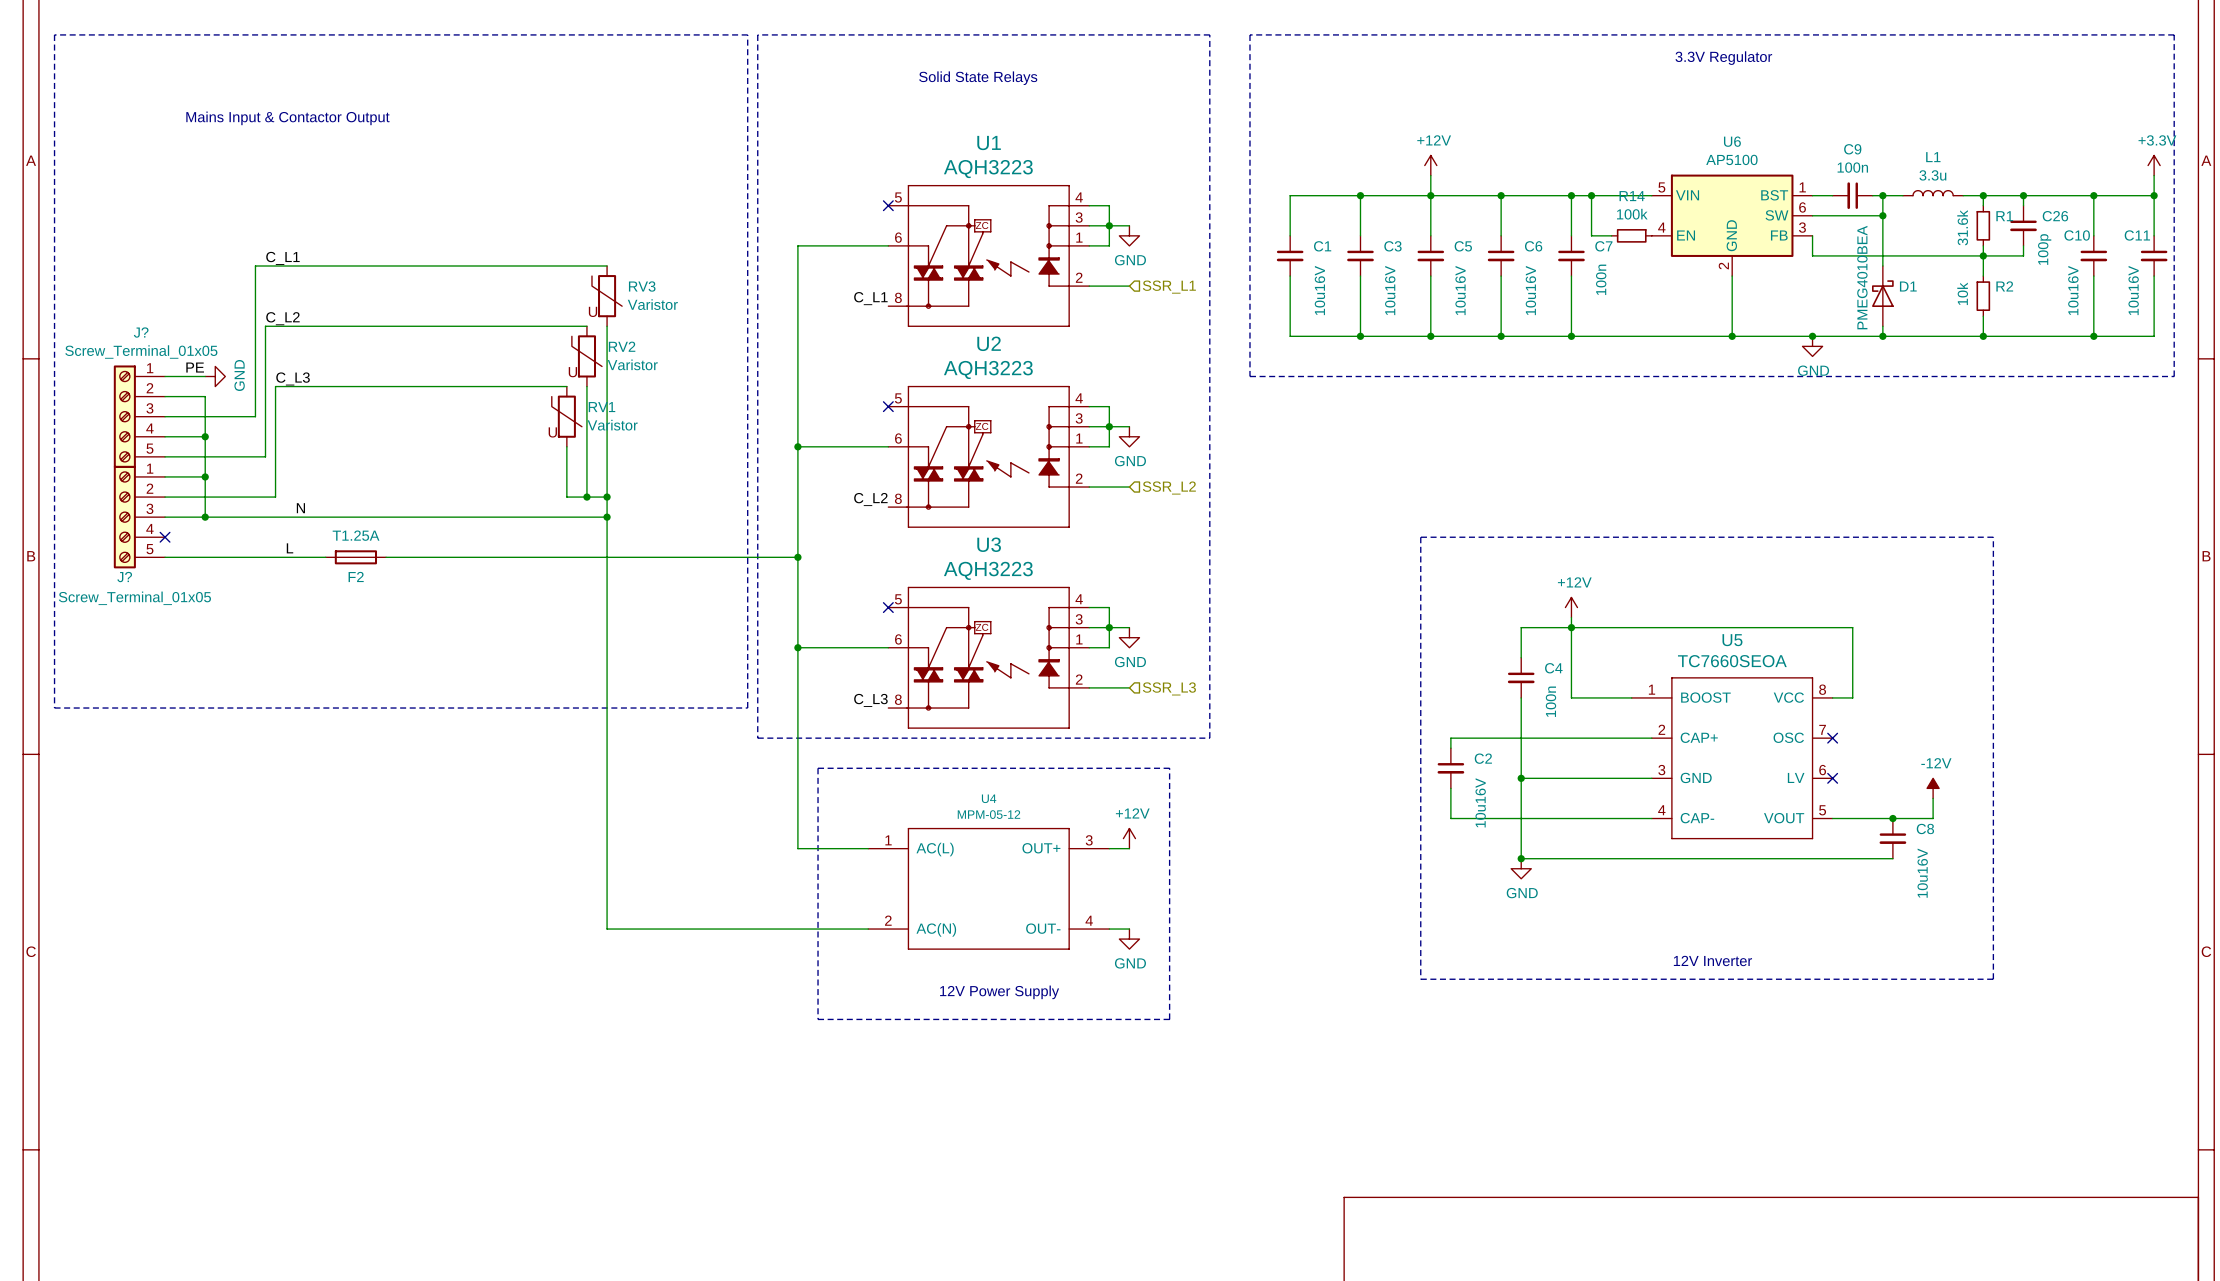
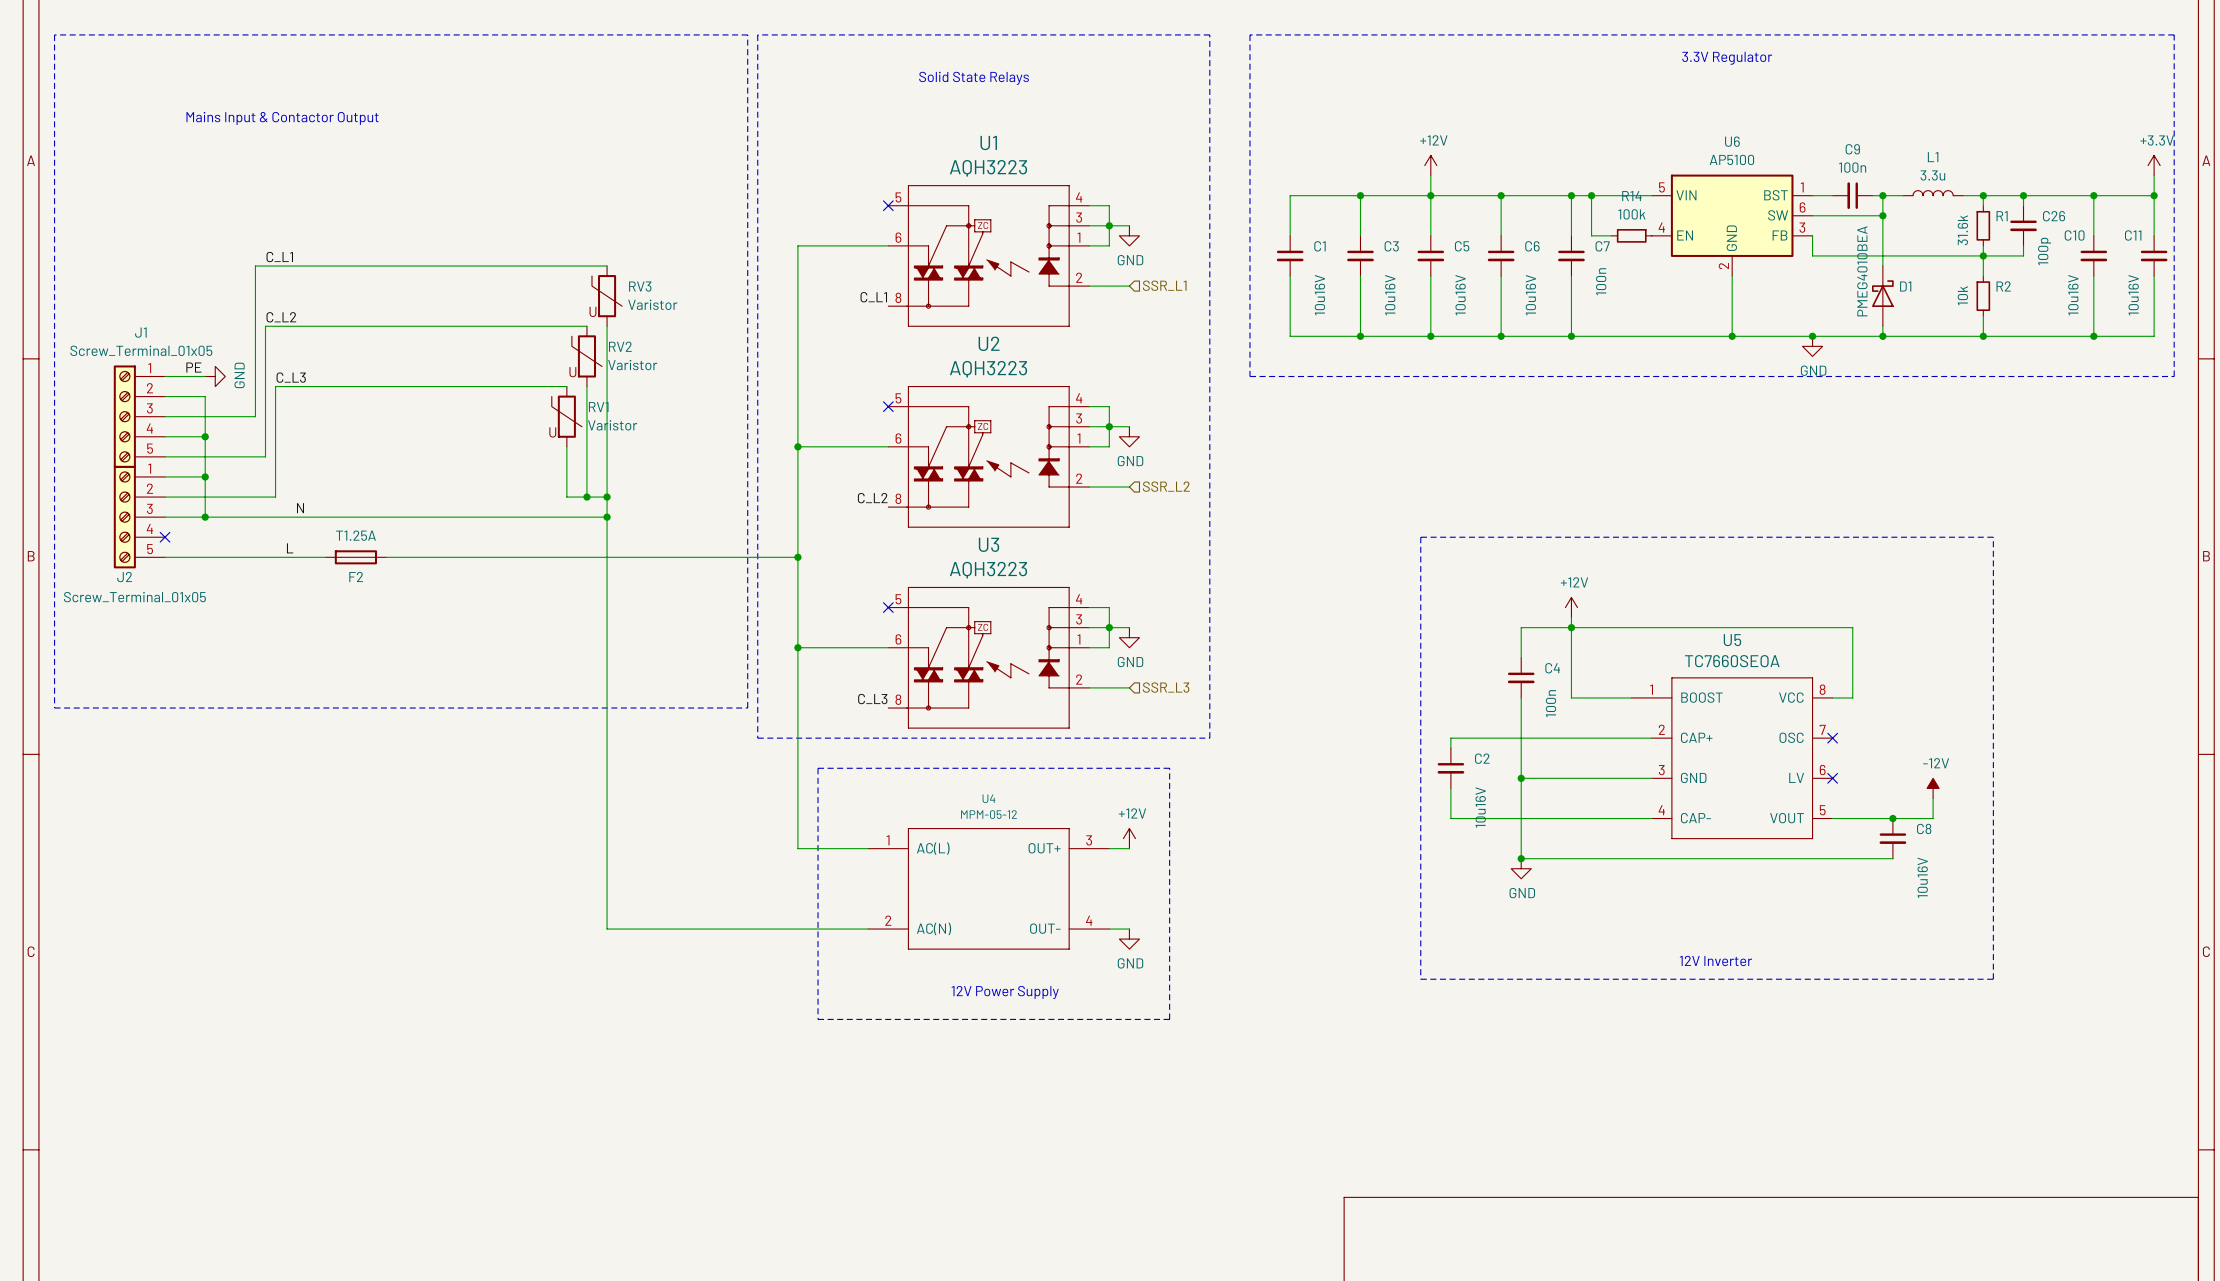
J? name: J? (141, 332) -> J1 (140, 332)
J? name: J? (124, 577) -> J2 (124, 577)

